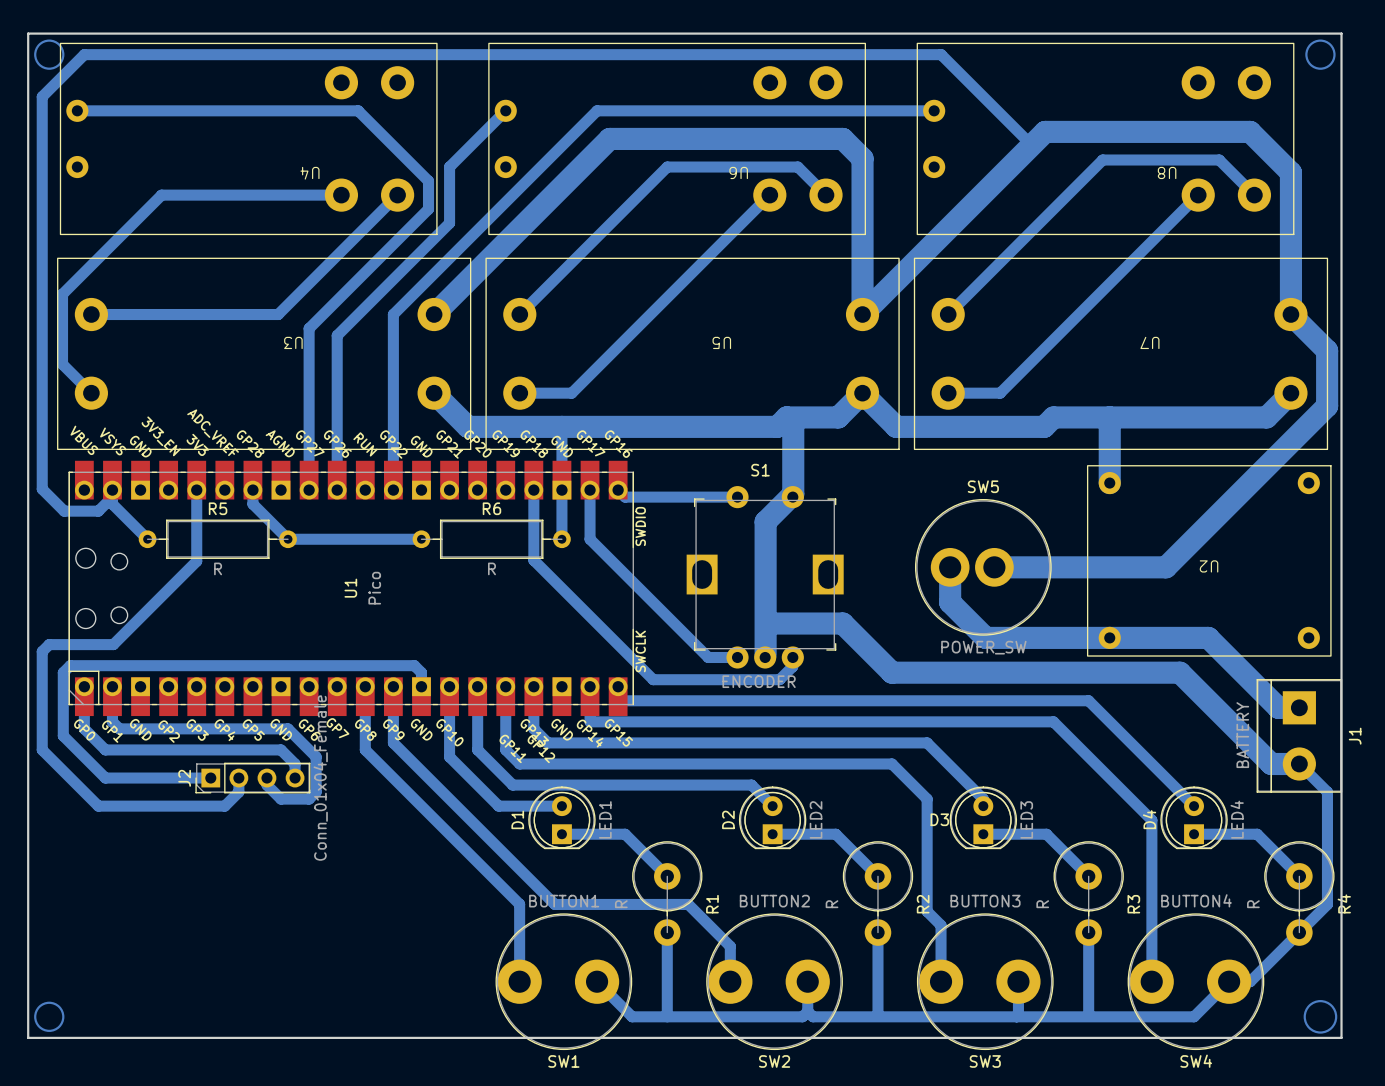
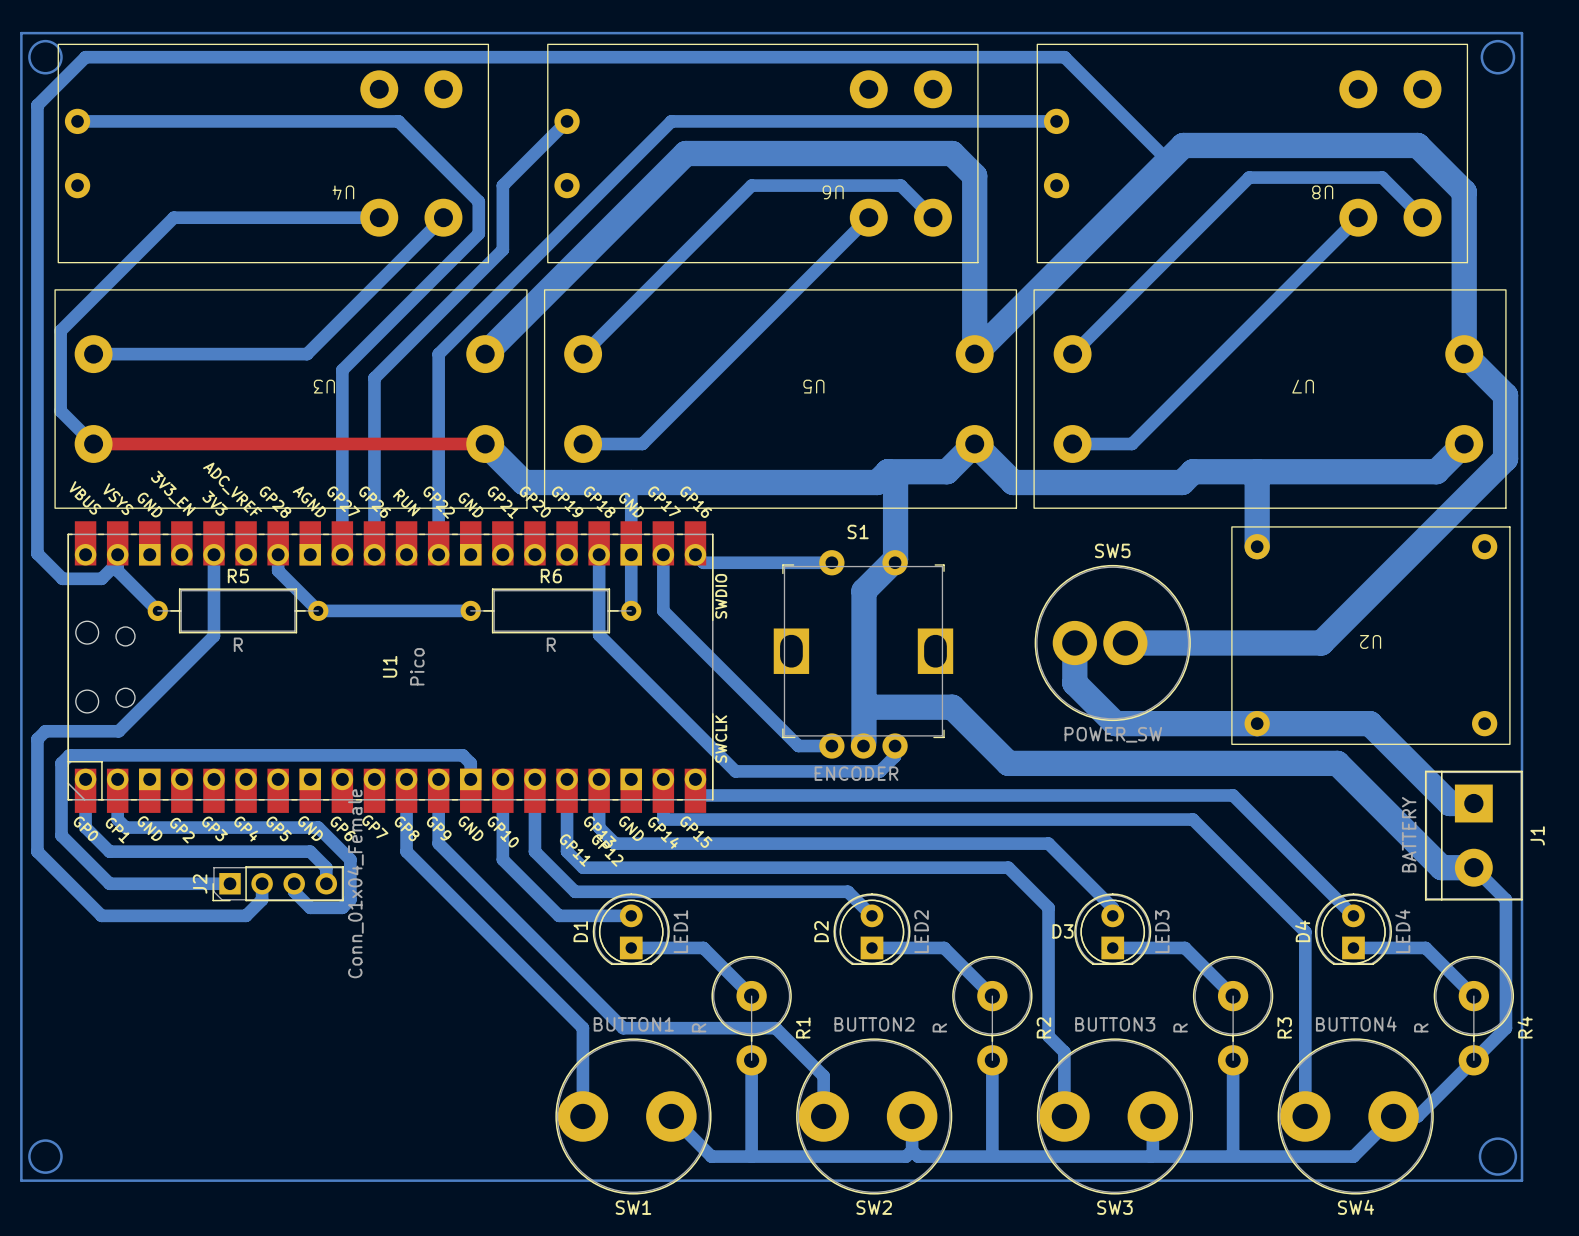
board edge: (28, 33) (1341, 33) (1341, 1037) (28, 1037) (28, 33) -> none
bottom track: none -> (21, 33) (1521, 33) (1521, 1180) (21, 1180) (21, 33)
top track: none -> (93, 443) (485, 443)

